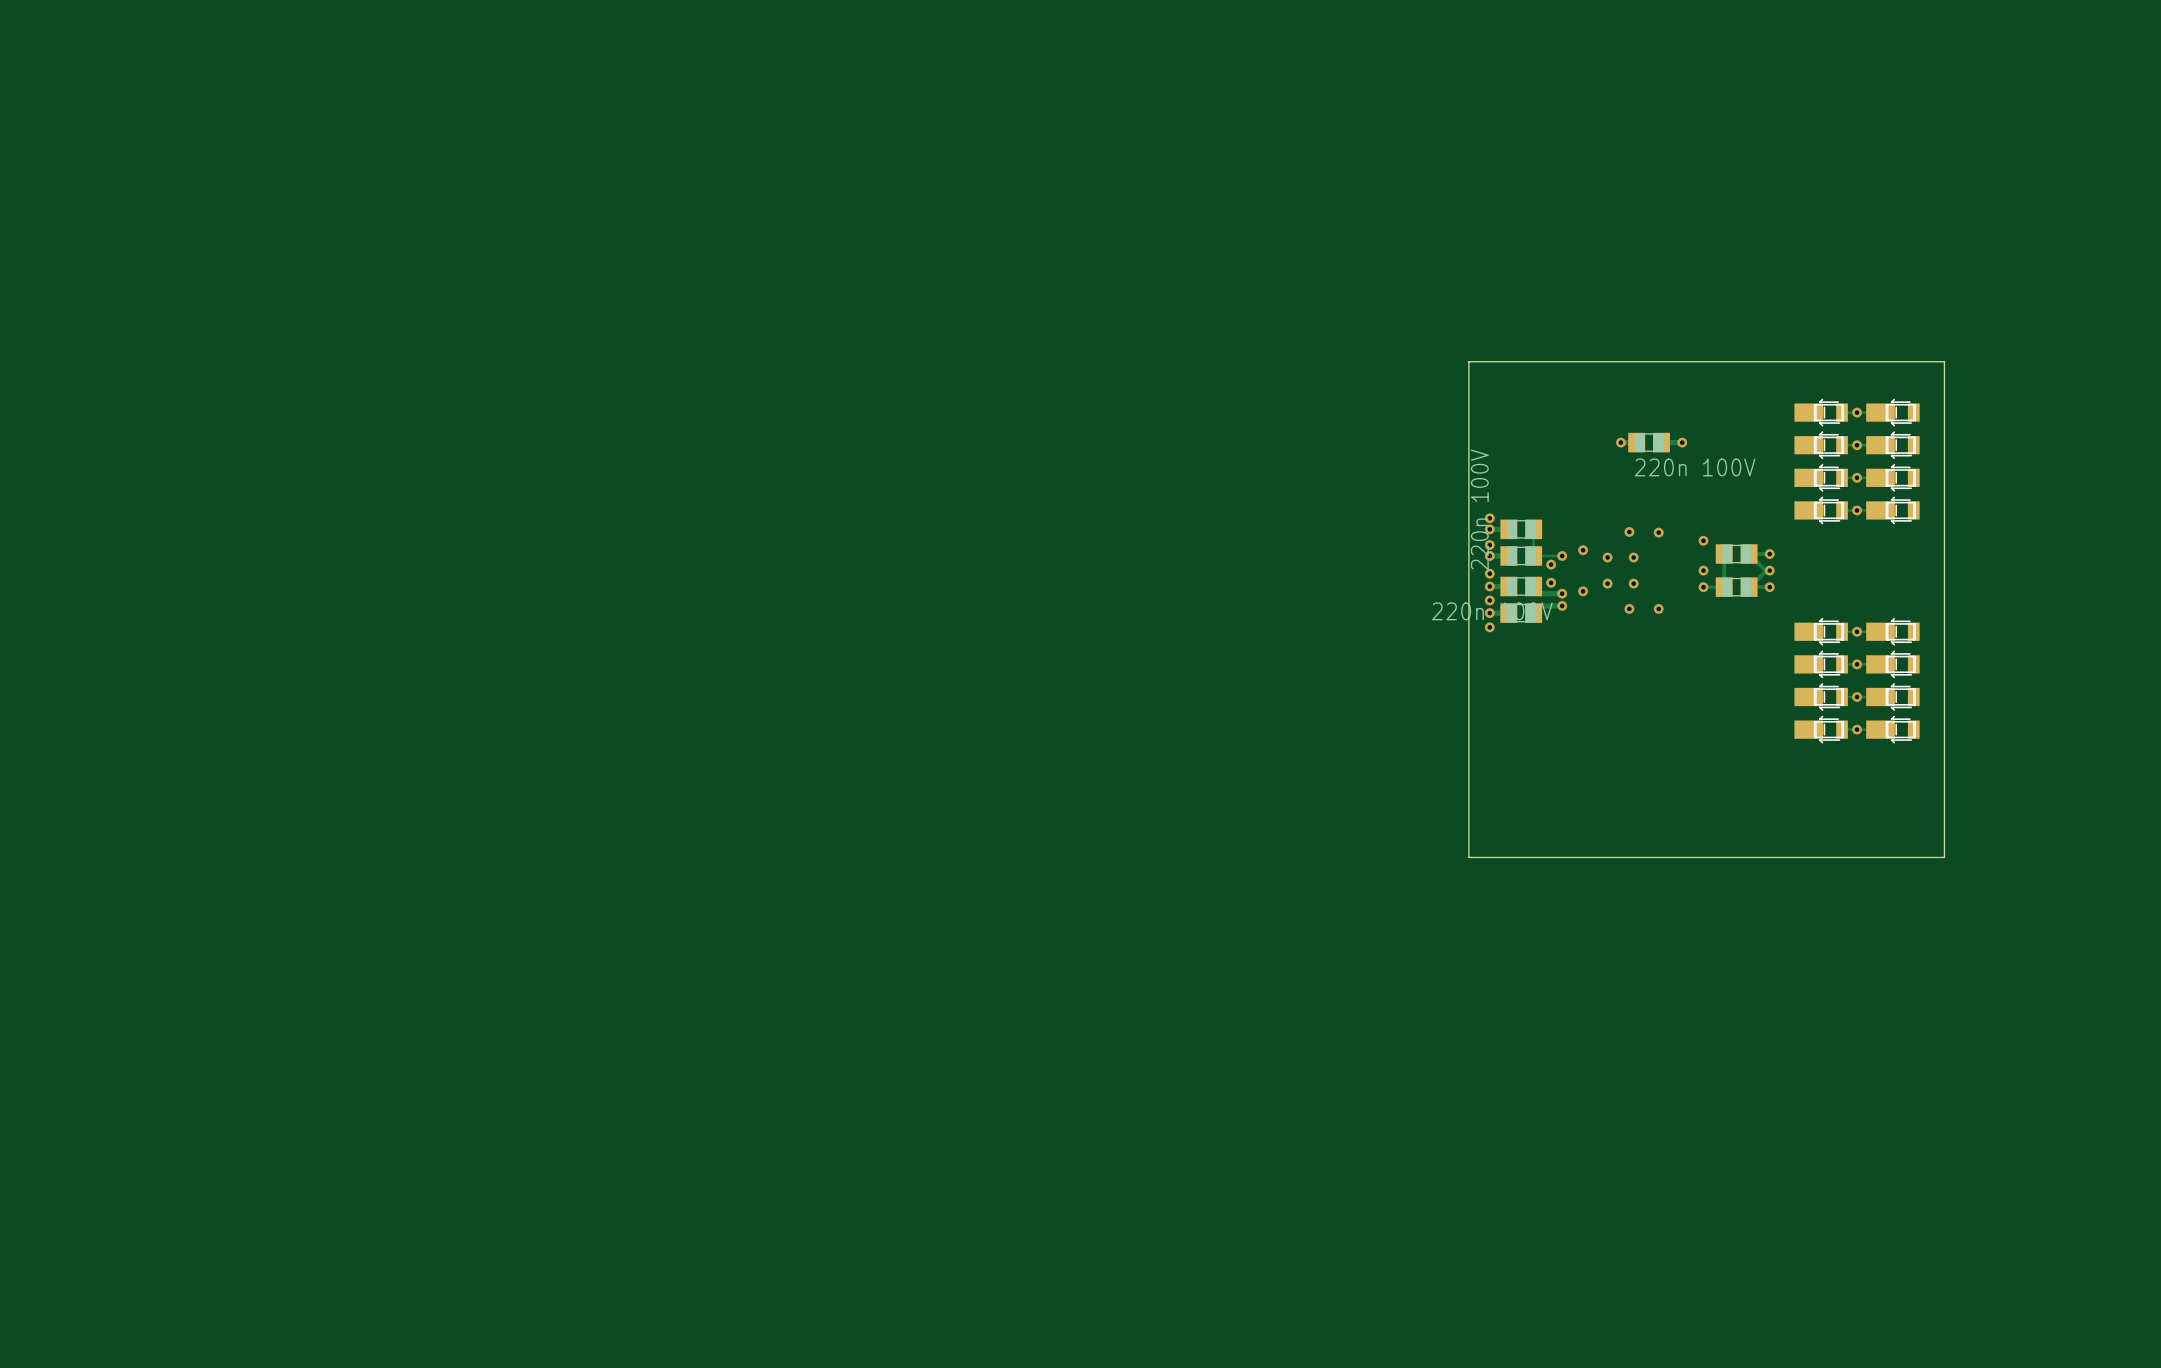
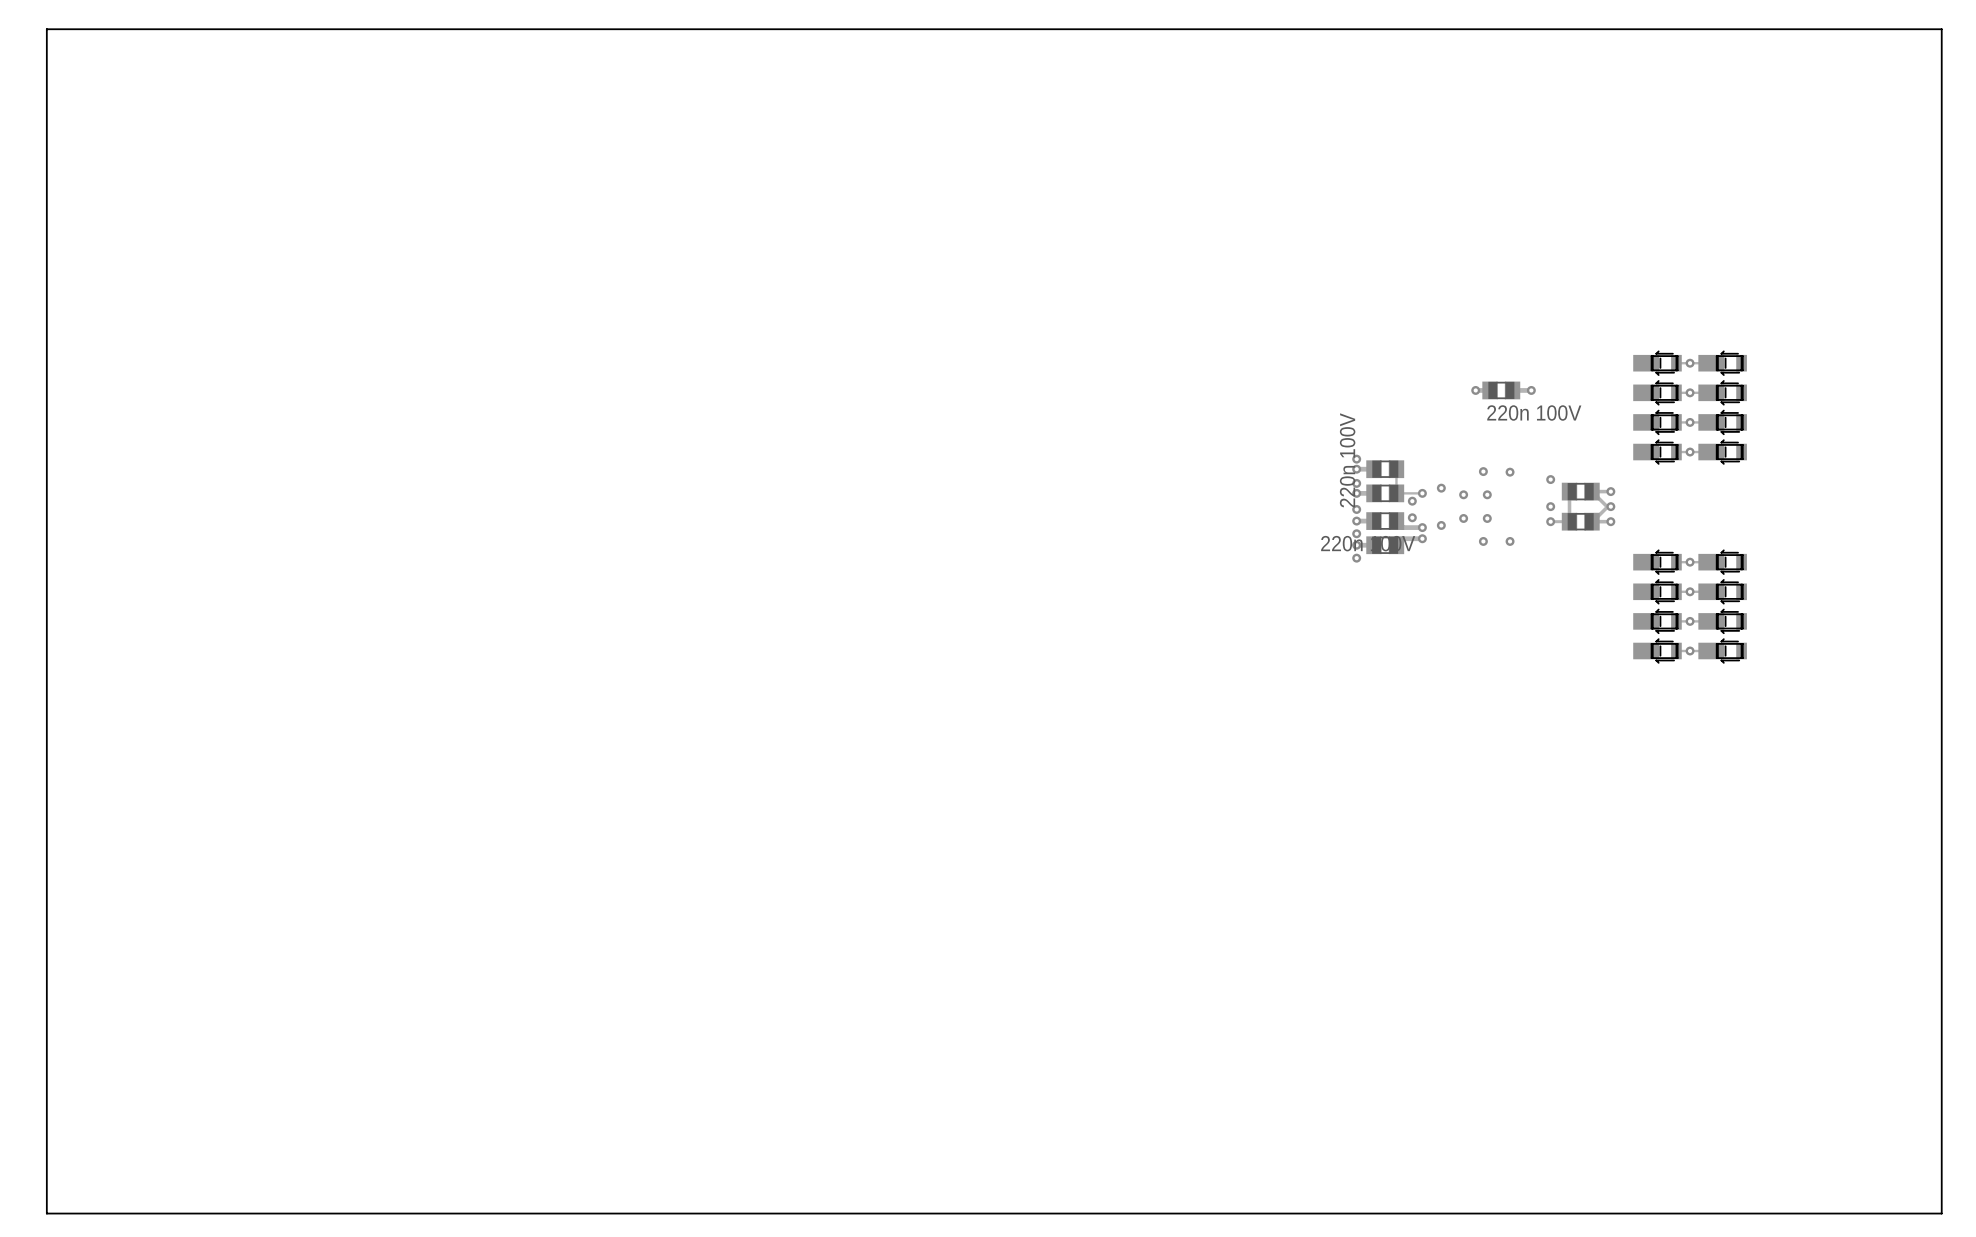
board edge: none -> (1941, 29) (46, 29) (46, 1213) (1941, 1213) (1941, 29)
board edge: (1944, 361) (1468, 361) (1468, 857) (1944, 857) (1944, 361) -> none

